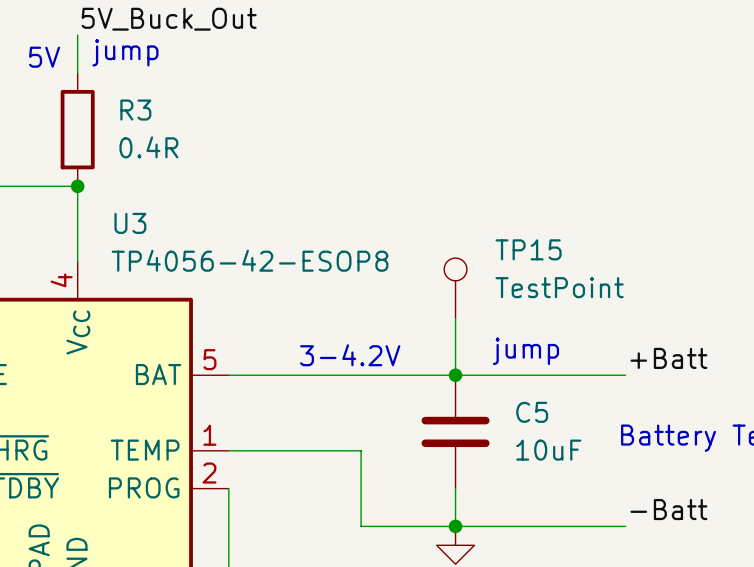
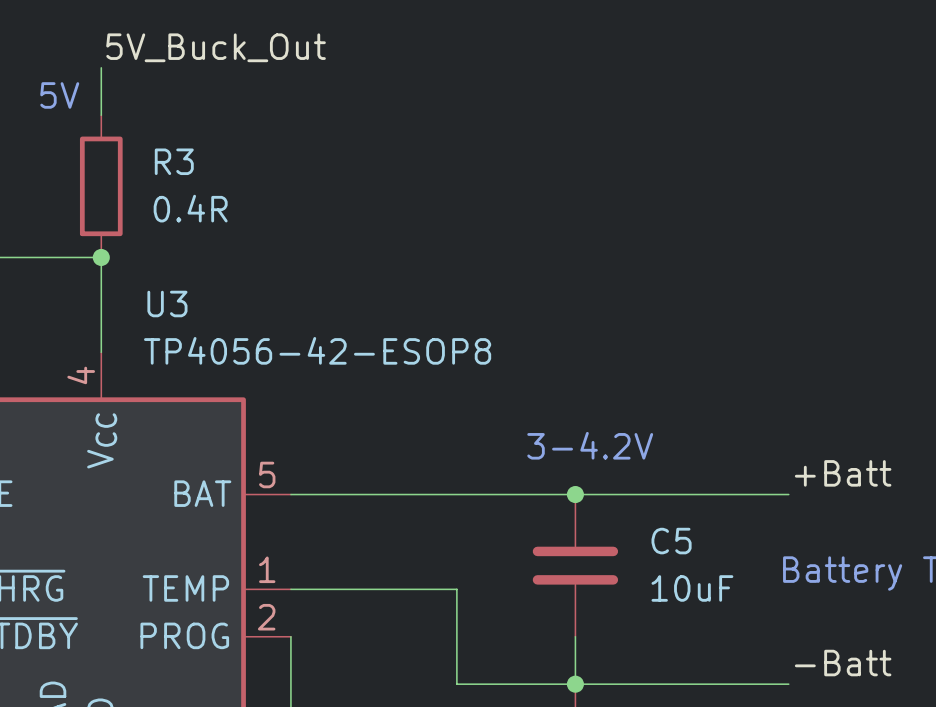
text: jump (125, 52) -> none
TP15: TestPoint (455, 288) -> none
wire: (455, 318) (455, 375) -> none
text: jump (525, 351) -> none
text position: 3-4.2V (350, 355) -> 3-4.2V (590, 445)

